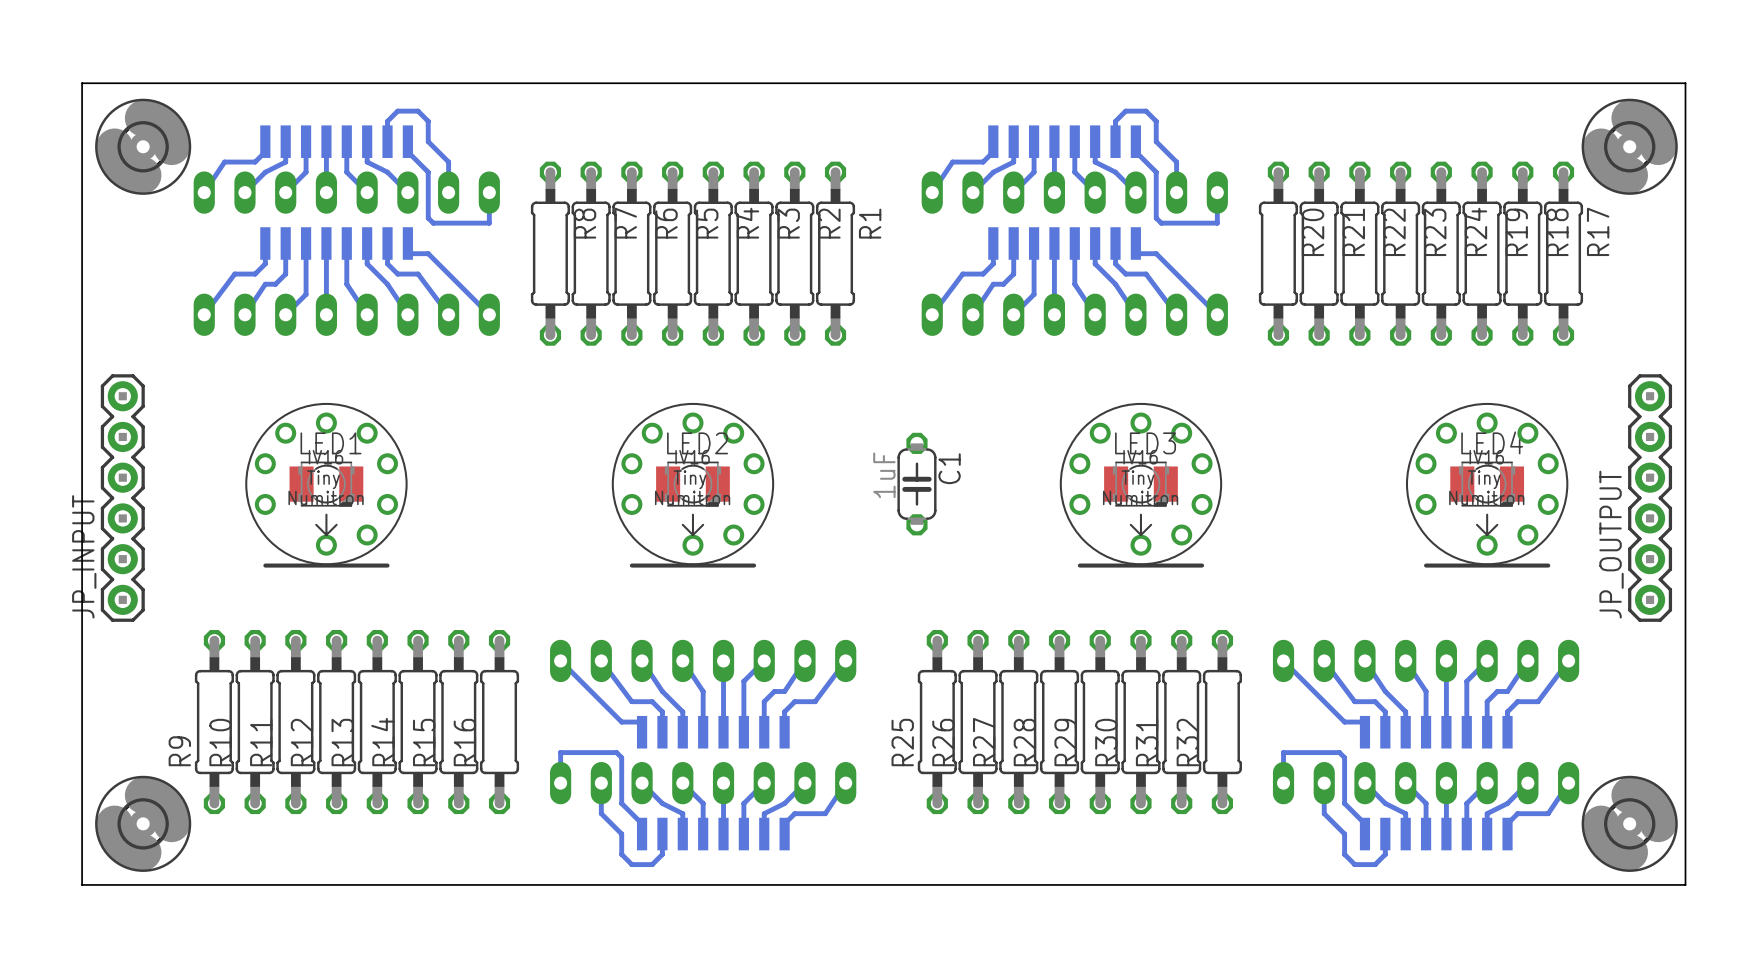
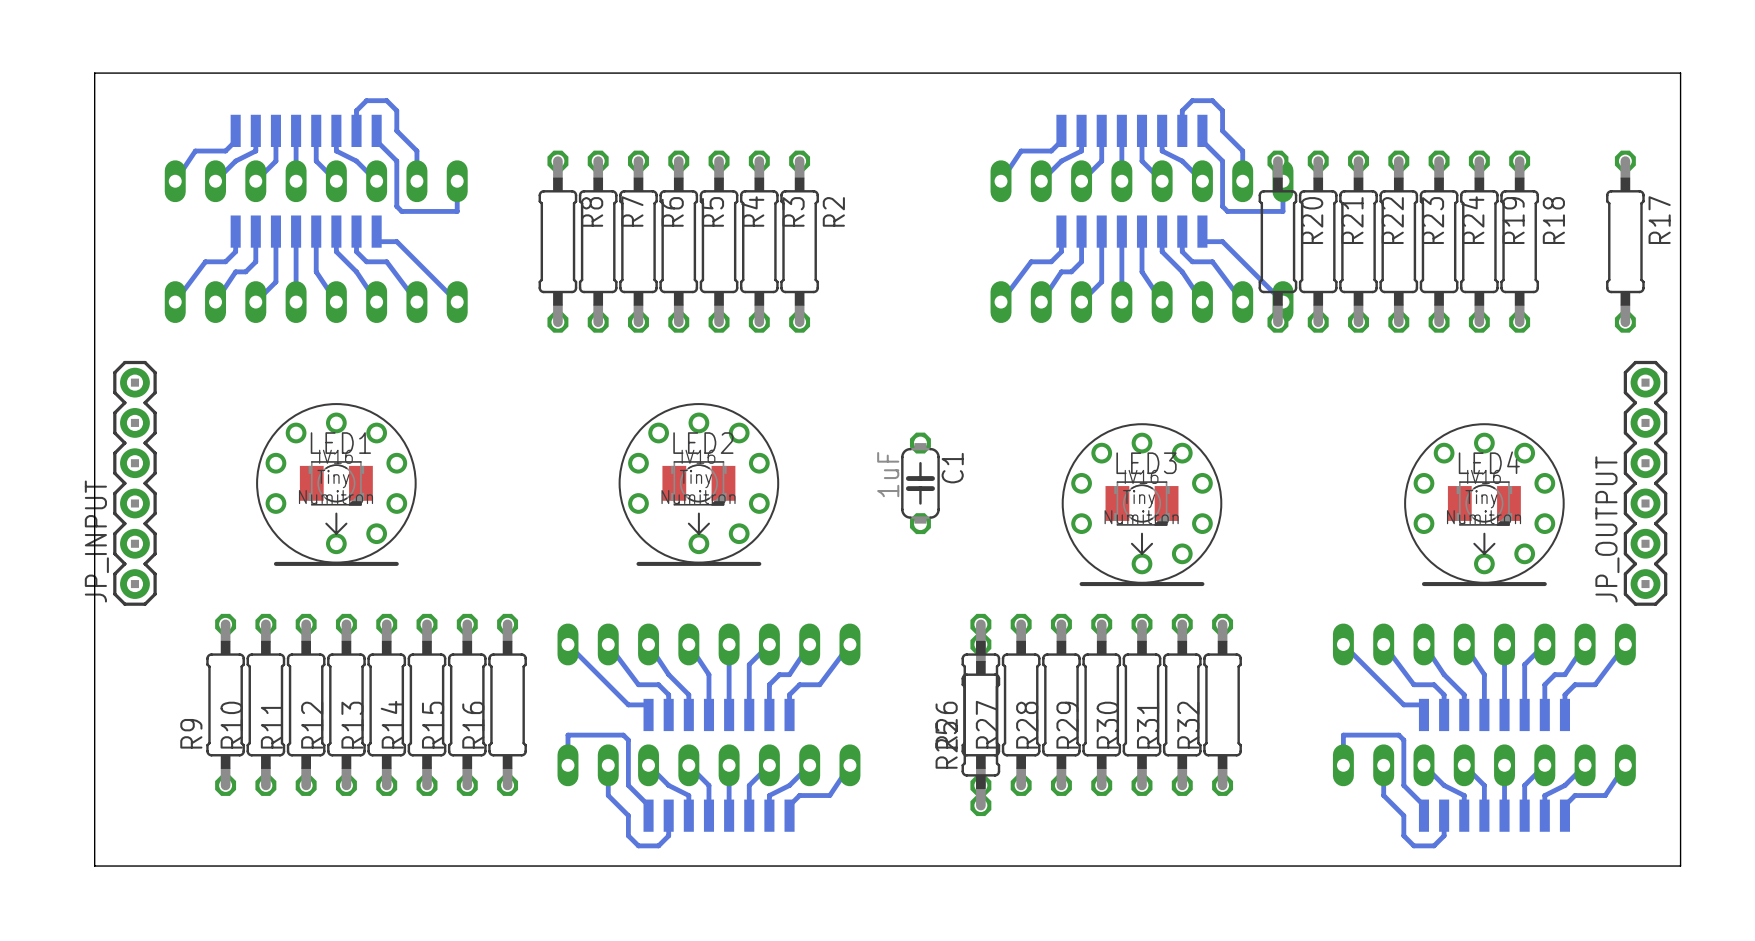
part: (143, 146) -> none
part: (1629, 146) -> none
part position: (346, 222) -> (316, 210)
part position: (1074, 222) -> (1142, 210)
R1: (835, 253) -> none
R17 position: (1563, 253) -> (1625, 241)
LED1 position: (326, 484) -> (336, 483)
LED2 position: (692, 484) -> (698, 483)
C1 position: (916, 484) -> (920, 483)
LED3 position: (1140, 484) -> (1142, 503)
LED4 position: (1487, 484) -> (1484, 503)
part position: (326, 485) -> (336, 484)
part position: (692, 485) -> (698, 484)
part position: (1140, 485) -> (1142, 504)
part position: (1487, 485) -> (1484, 504)
R25 position: (937, 722) -> (980, 725)
part position: (1426, 753) -> (1484, 735)
part: (143, 823) -> none
part: (1629, 823) -> none

